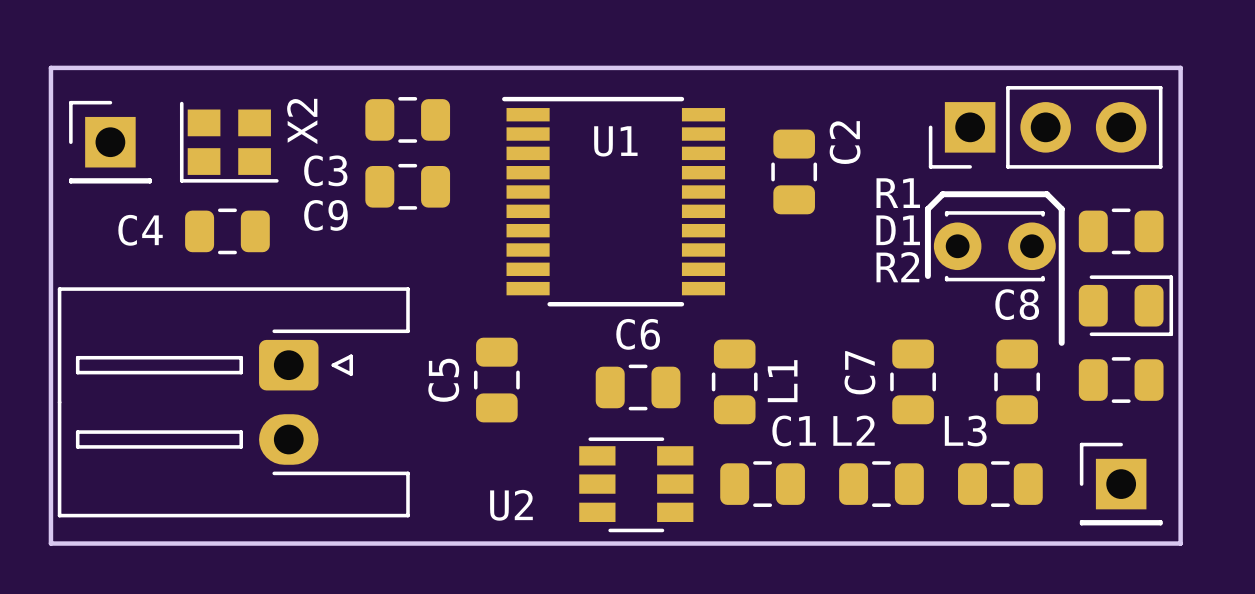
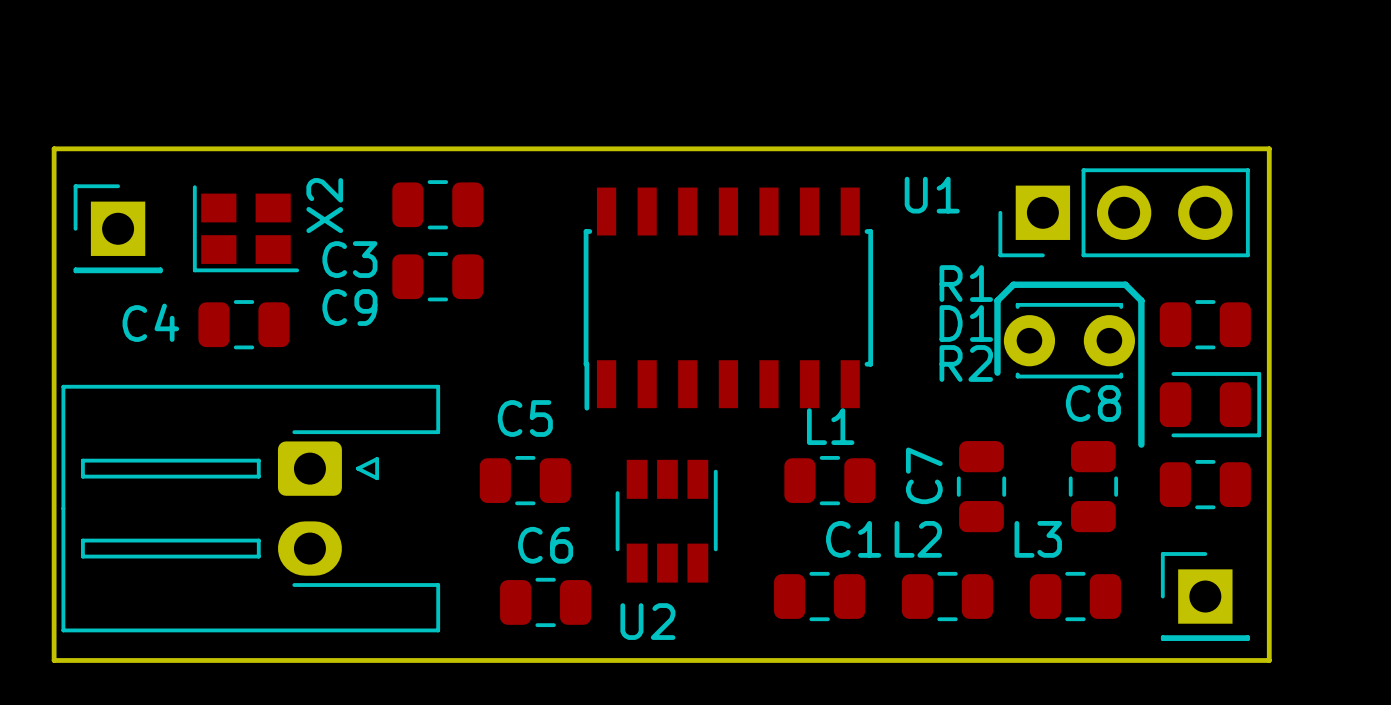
U1 footprint: [502, 96, 726, 307] -> [583, 187, 874, 411]
U1 name position: U1 (615, 141) -> U1 (932, 195)
C2: (794, 171) -> none
C5 rotation: 0° (496, 380) -> 90° clockwise (525, 480)
L1 rotation: 0° (734, 381) -> 90° clockwise (829, 480)
L1 name position: L1 (782, 381) -> L1 (830, 426)
C6 position: (638, 387) -> (545, 602)
U2 rotation: 0° (636, 484) -> 90° clockwise (666, 521)
U2 position: (636, 484) -> (666, 521)
U2 name position: U2 (511, 505) -> U2 (647, 621)

